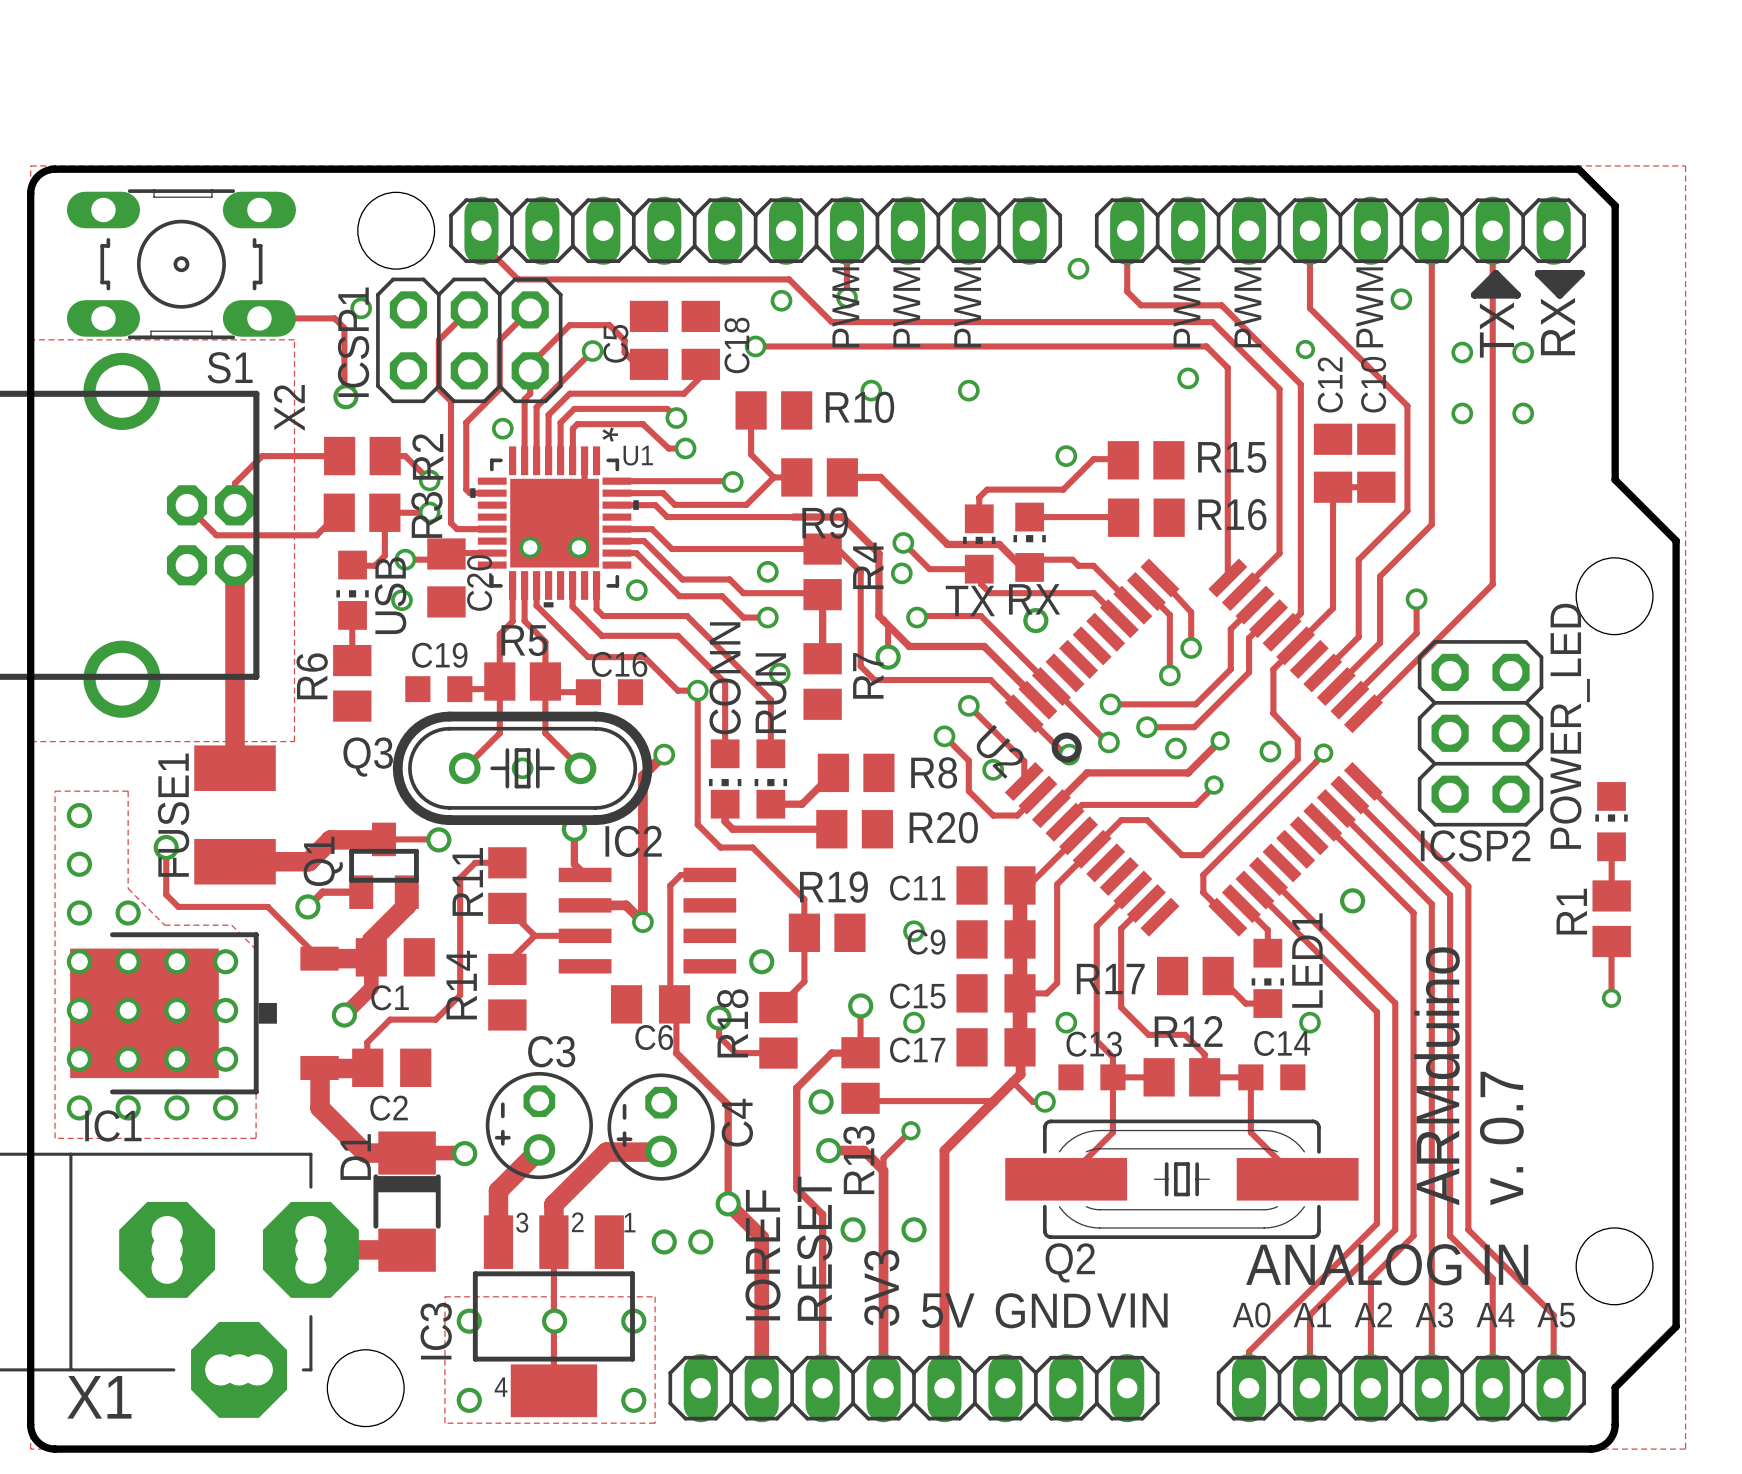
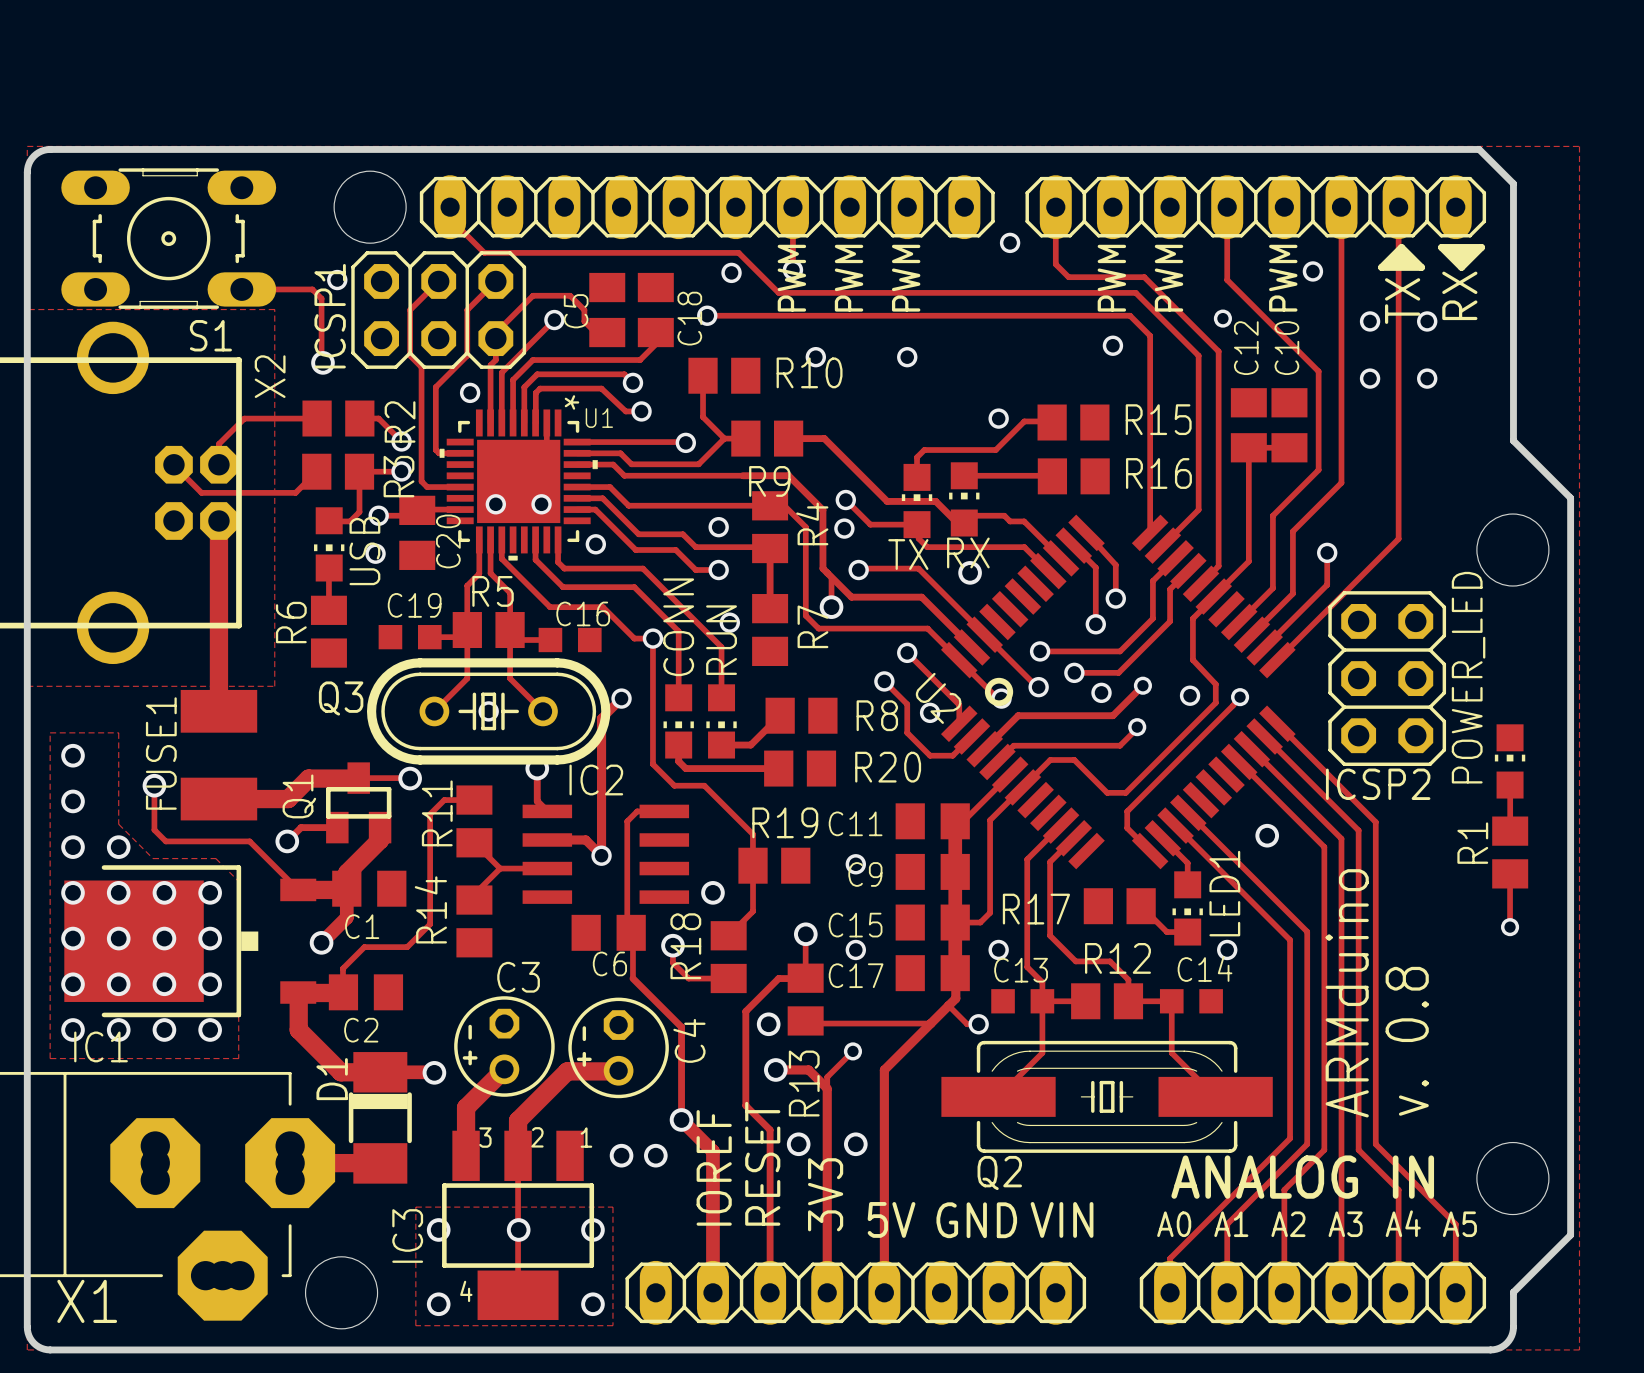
text: v. 0.7 (1501, 1138) -> v. 0.8 (1407, 1041)

